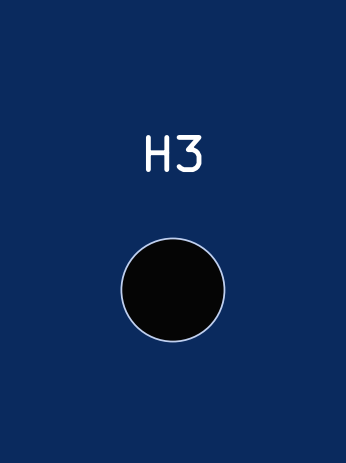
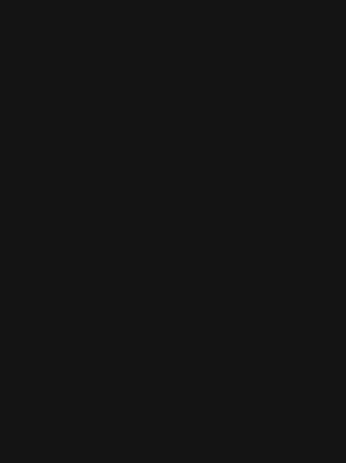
H3: (172, 290) -> none

